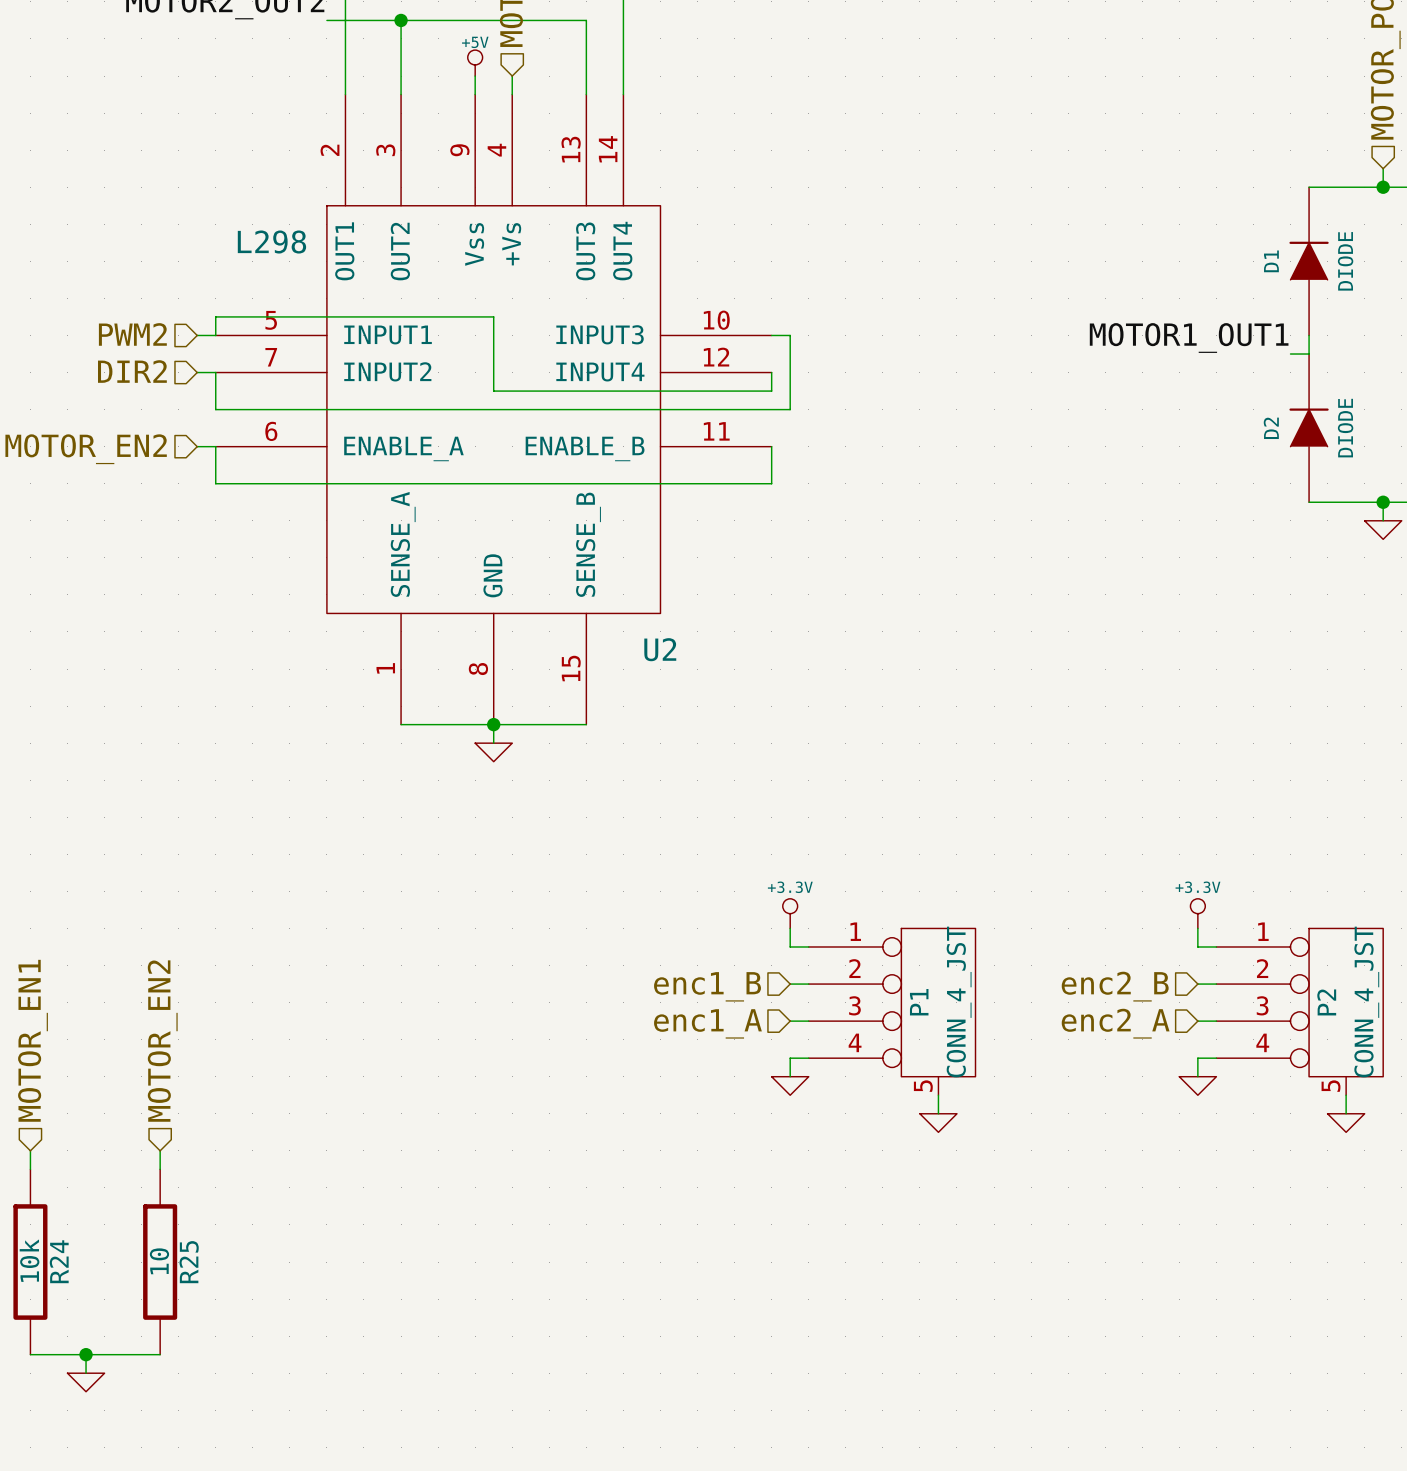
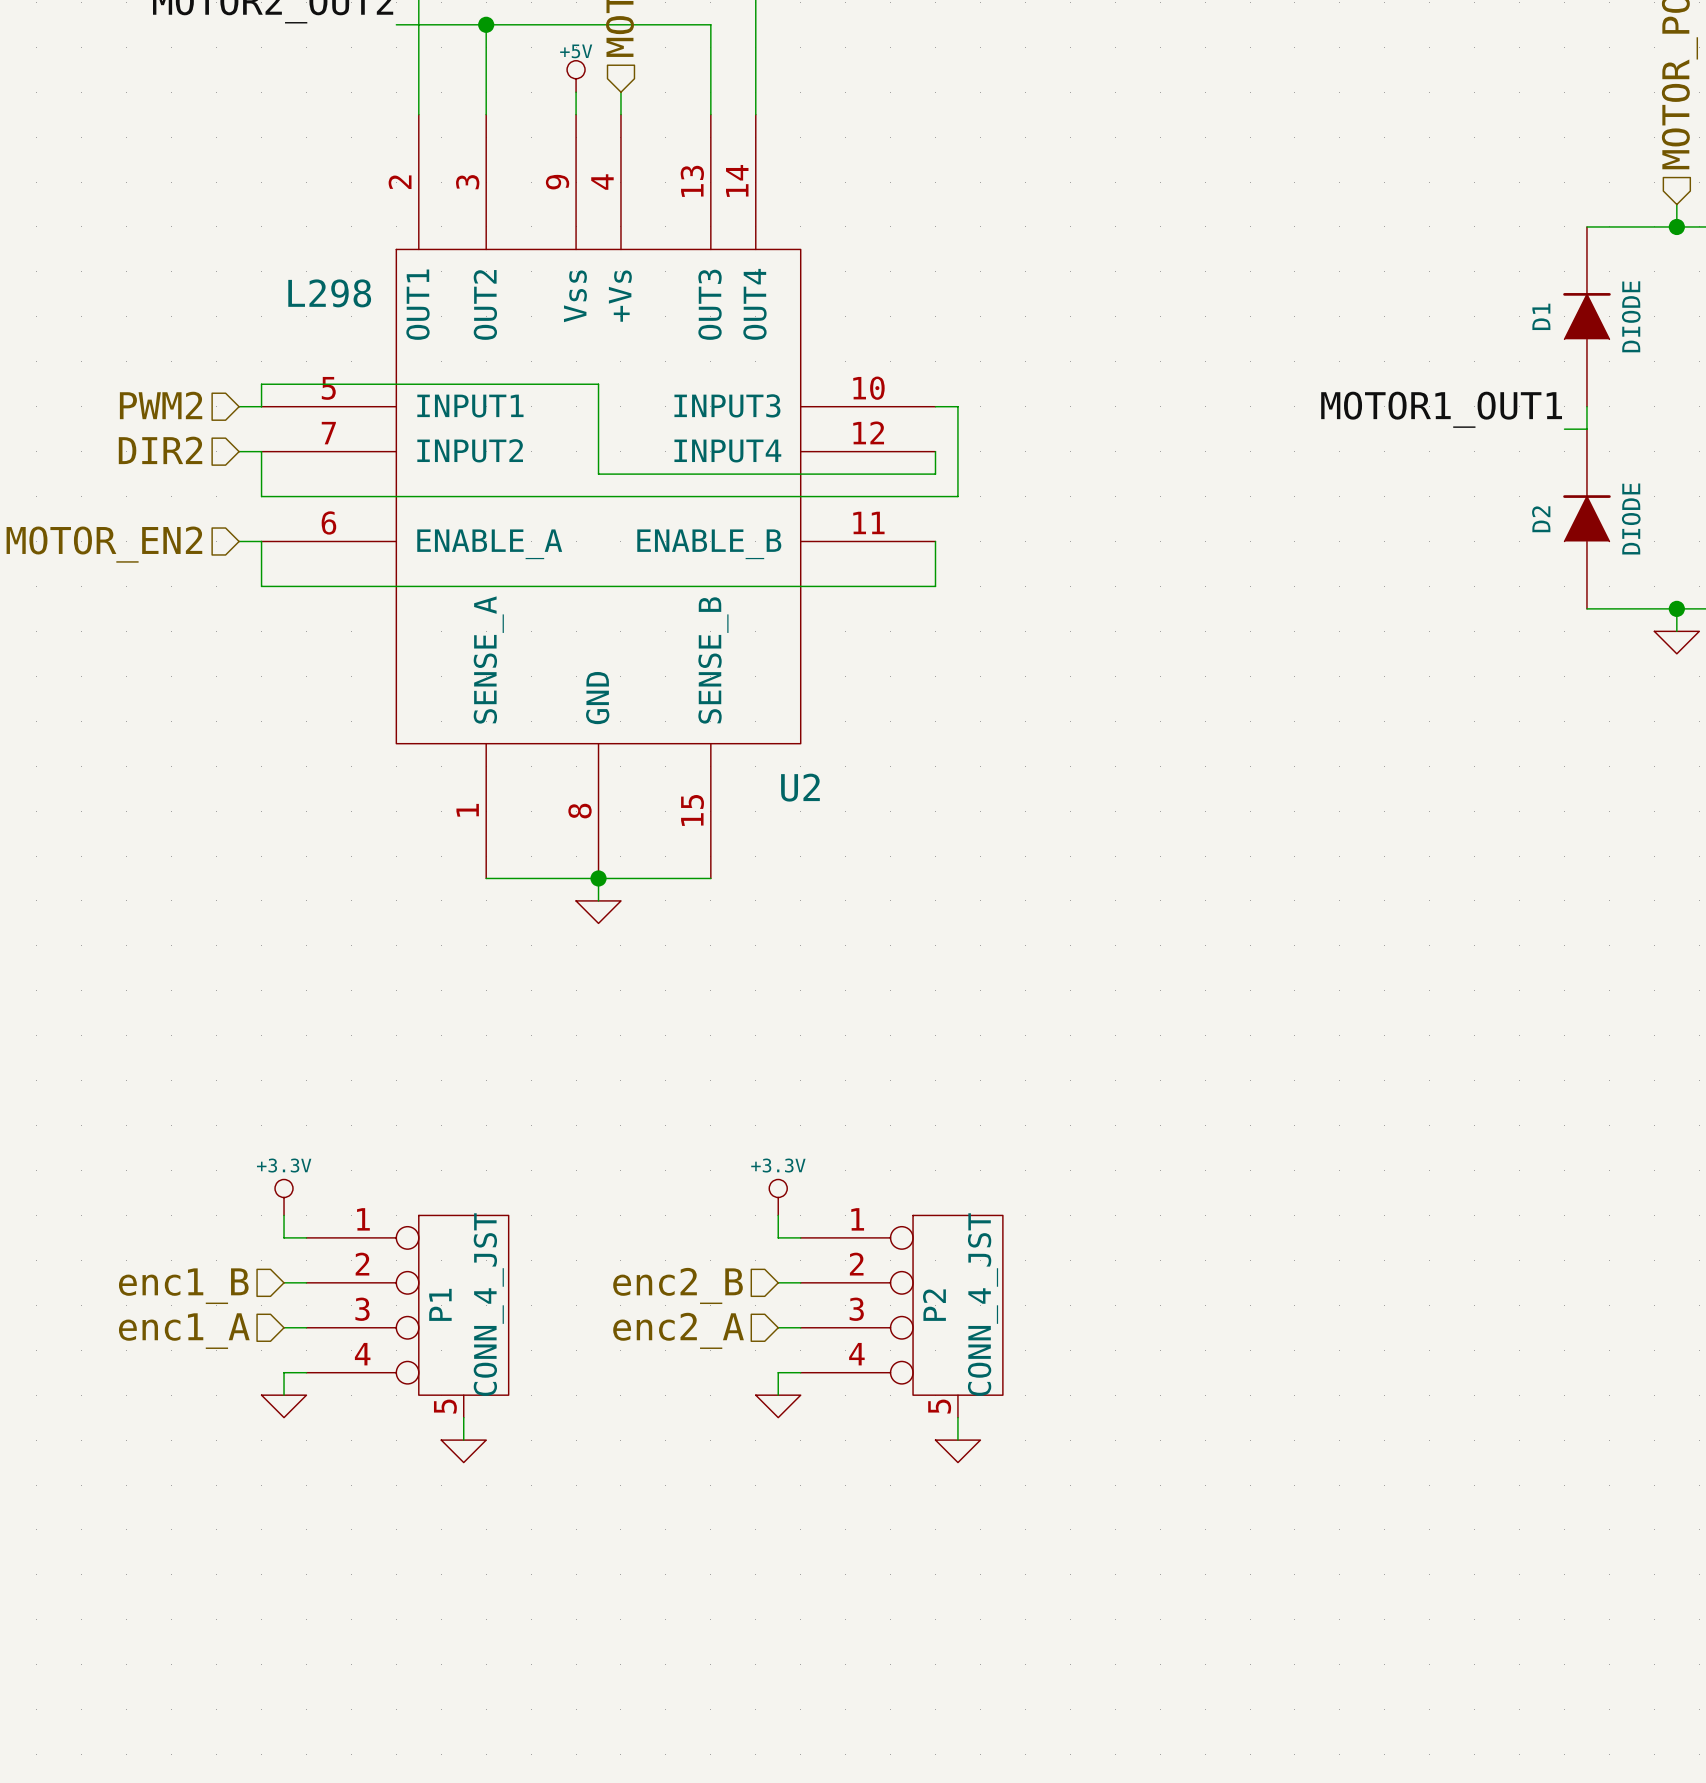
power symbol position: +3.3V (790, 913) -> +3.3V (778, 1197)
power symbol: +3.3V (1197, 913) -> none
wire: (790, 928) (790, 946) (808, 946) -> (778, 1215) (778, 1237) (800, 1237)
wire: (1197, 928) (1197, 946) (1216, 946) -> none
wire: (790, 984) (808, 984) -> (778, 1282) (800, 1282)
wire: (1197, 984) (1216, 984) -> none
hierarchical label: enc1_B (707, 986) -> none
hierarchical label: enc2_B (1115, 986) -> none
power symbol: none -> +3.3V (284, 1197)
wire: none -> (284, 1215) (284, 1237) (306, 1237)
P1 position: (892, 1011) -> (407, 1316)
P2 position: (1299, 1011) -> (901, 1316)
wire: (790, 1021) (808, 1021) -> (778, 1327) (800, 1327)
wire: (1197, 1021) (1216, 1021) -> none
hierarchical label: enc1_A (707, 1023) -> none
hierarchical label: enc2_A (1115, 1023) -> none
hierarchical label: MOTOR_EN1 (33, 1040) -> none
hierarchical label: MOTOR_EN2 (162, 1041) -> none
wire: none -> (284, 1282) (306, 1282)
wire: (808, 1058) (790, 1058) (790, 1076) -> (800, 1372) (778, 1372) (778, 1395)
wire: (1216, 1058) (1197, 1058) (1197, 1076) -> none
hierarchical label: none -> enc1_B (183, 1286)
hierarchical label: none -> enc2_B (678, 1285)
power symbol: (790, 1085) -> none
power symbol: (1197, 1085) -> none
wire: none -> (284, 1327) (306, 1327)
wire: (938, 1095) (938, 1113) -> (957, 1417) (957, 1440)
wire: (1346, 1095) (1346, 1113) -> none
hierarchical label: none -> enc2_A (678, 1330)
hierarchical label: none -> enc1_A (184, 1331)
power symbol: (938, 1123) -> none
power symbol: (1346, 1123) -> none
wire: none -> (306, 1372) (284, 1372) (284, 1395)
wire: (30, 1150) (30, 1169) -> none
wire: (160, 1150) (160, 1169) -> (463, 1417) (463, 1440)
power symbol: none -> (284, 1406)
power symbol: none -> (778, 1406)
power symbol: none -> (463, 1451)
power symbol: none -> (957, 1451)
R24: 10k (30, 1262) -> none
R25: 10 (160, 1262) -> none
wire: (30, 1354) (160, 1354) -> none
wire: (86, 1354) (86, 1373) -> none
junction: (86, 1354) -> none
power symbol: (86, 1382) -> none

